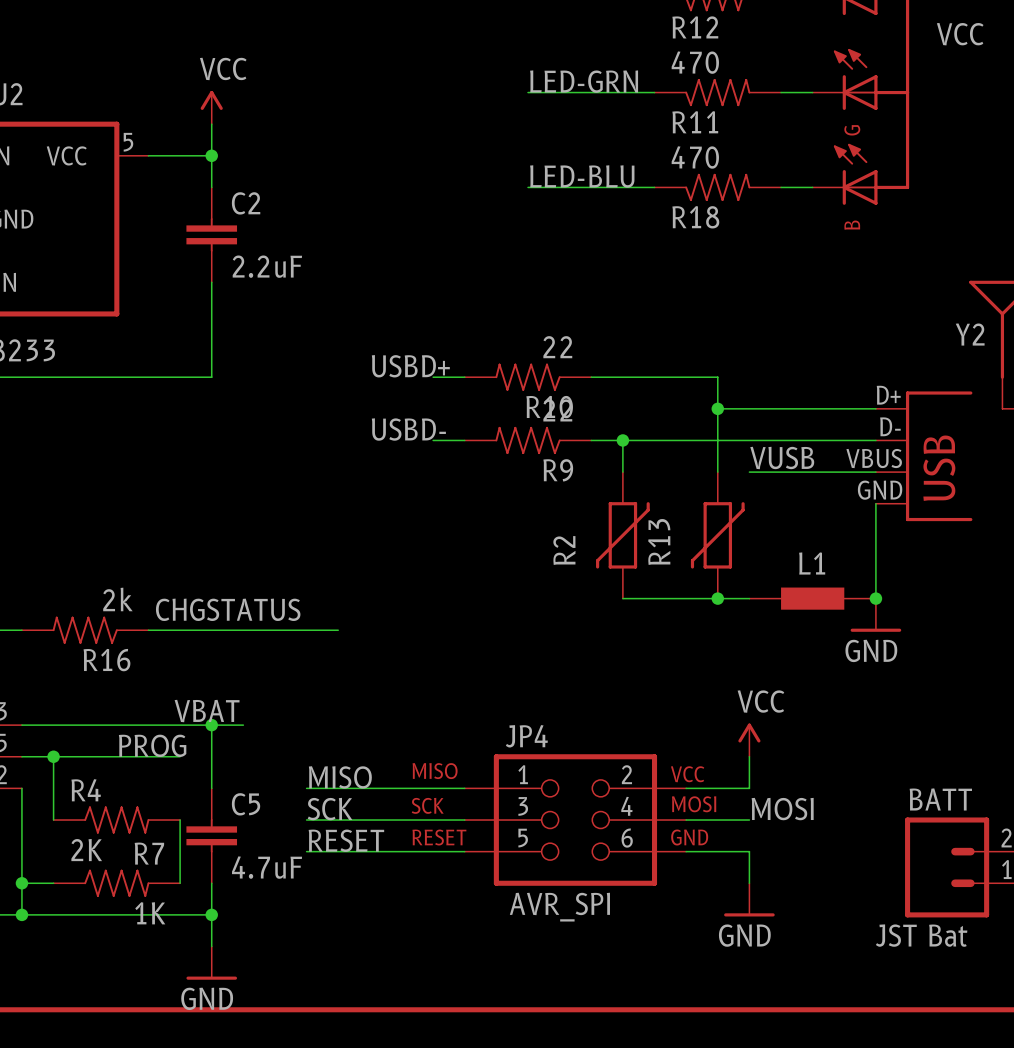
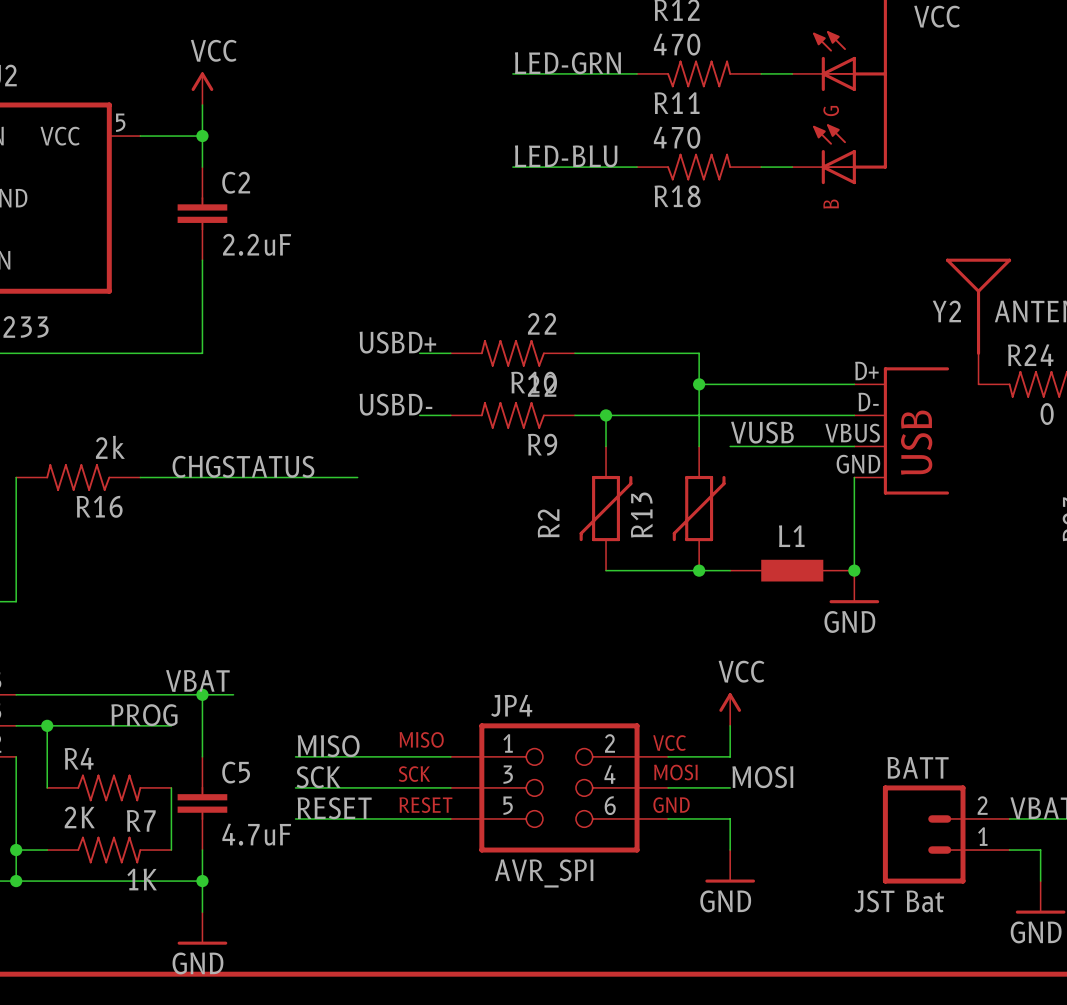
wire: none -> (16, 477) (16, 601)
wire: none -> (140, 477) (357, 477)
label position: CHGSTATUS (228, 609) -> CHGSTATUS (243, 466)
R16 position: (85, 630) -> (78, 477)
wire: (148, 630) (338, 630) -> none

